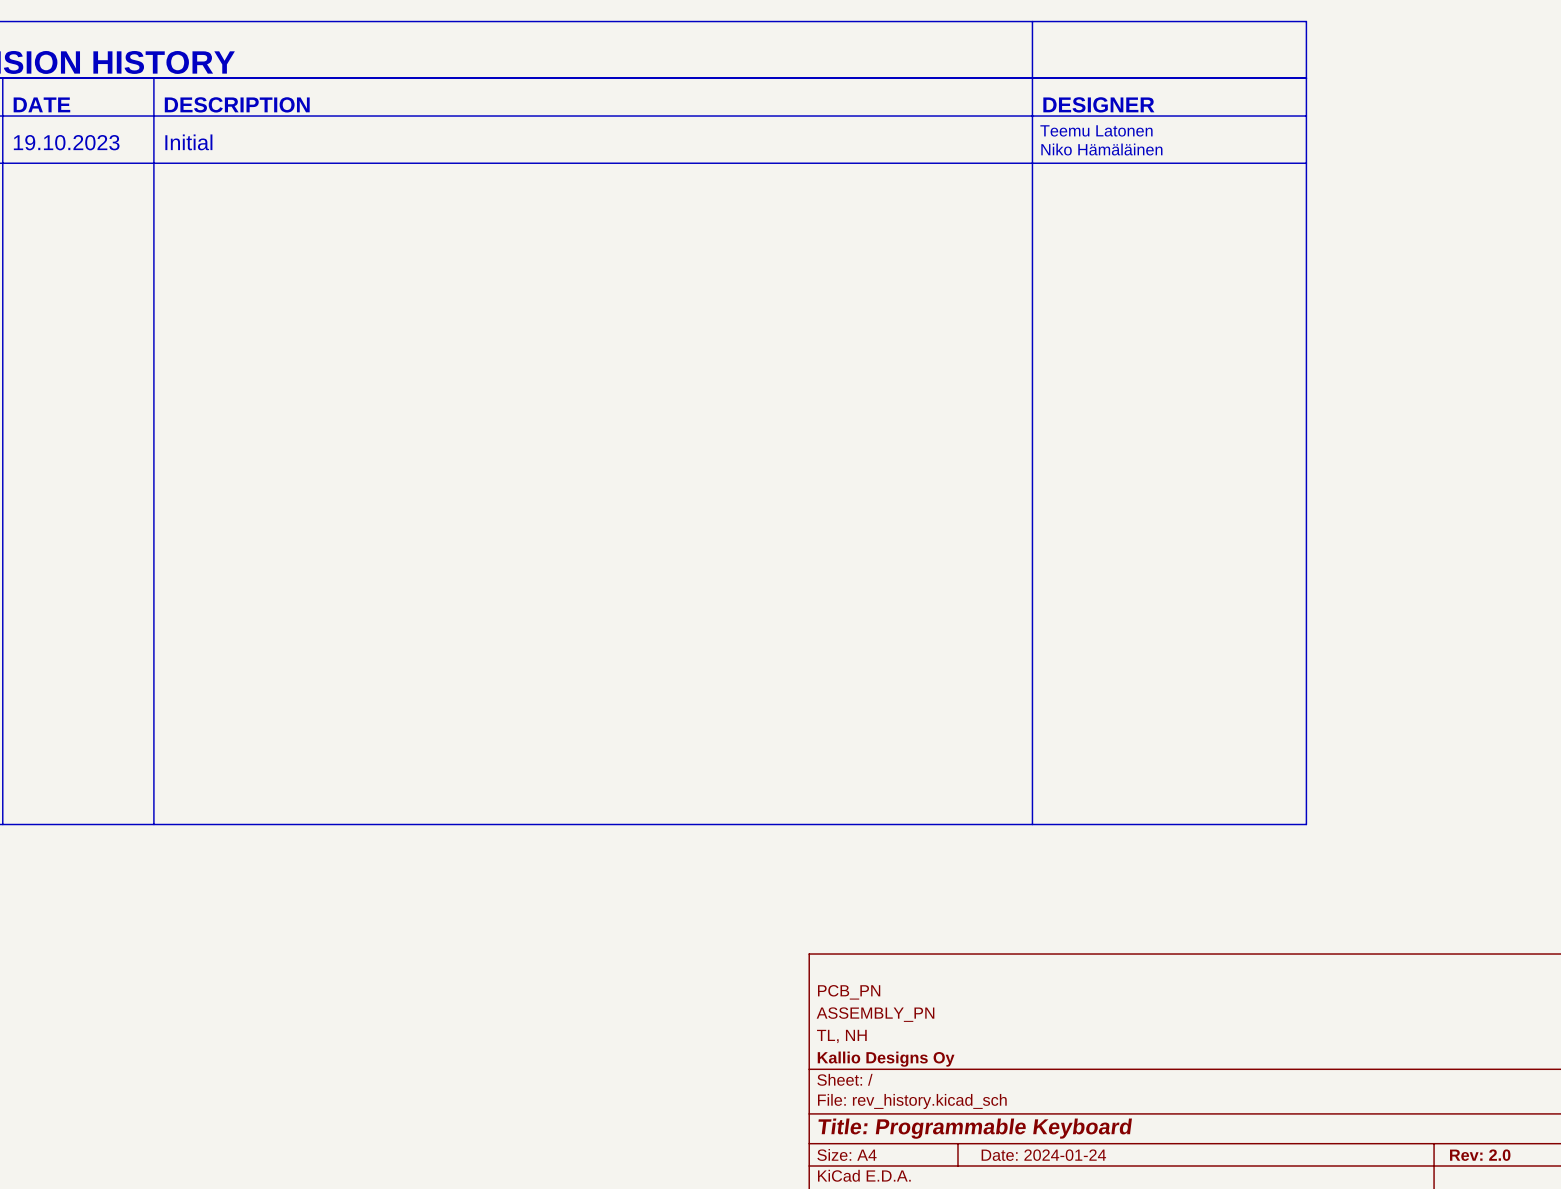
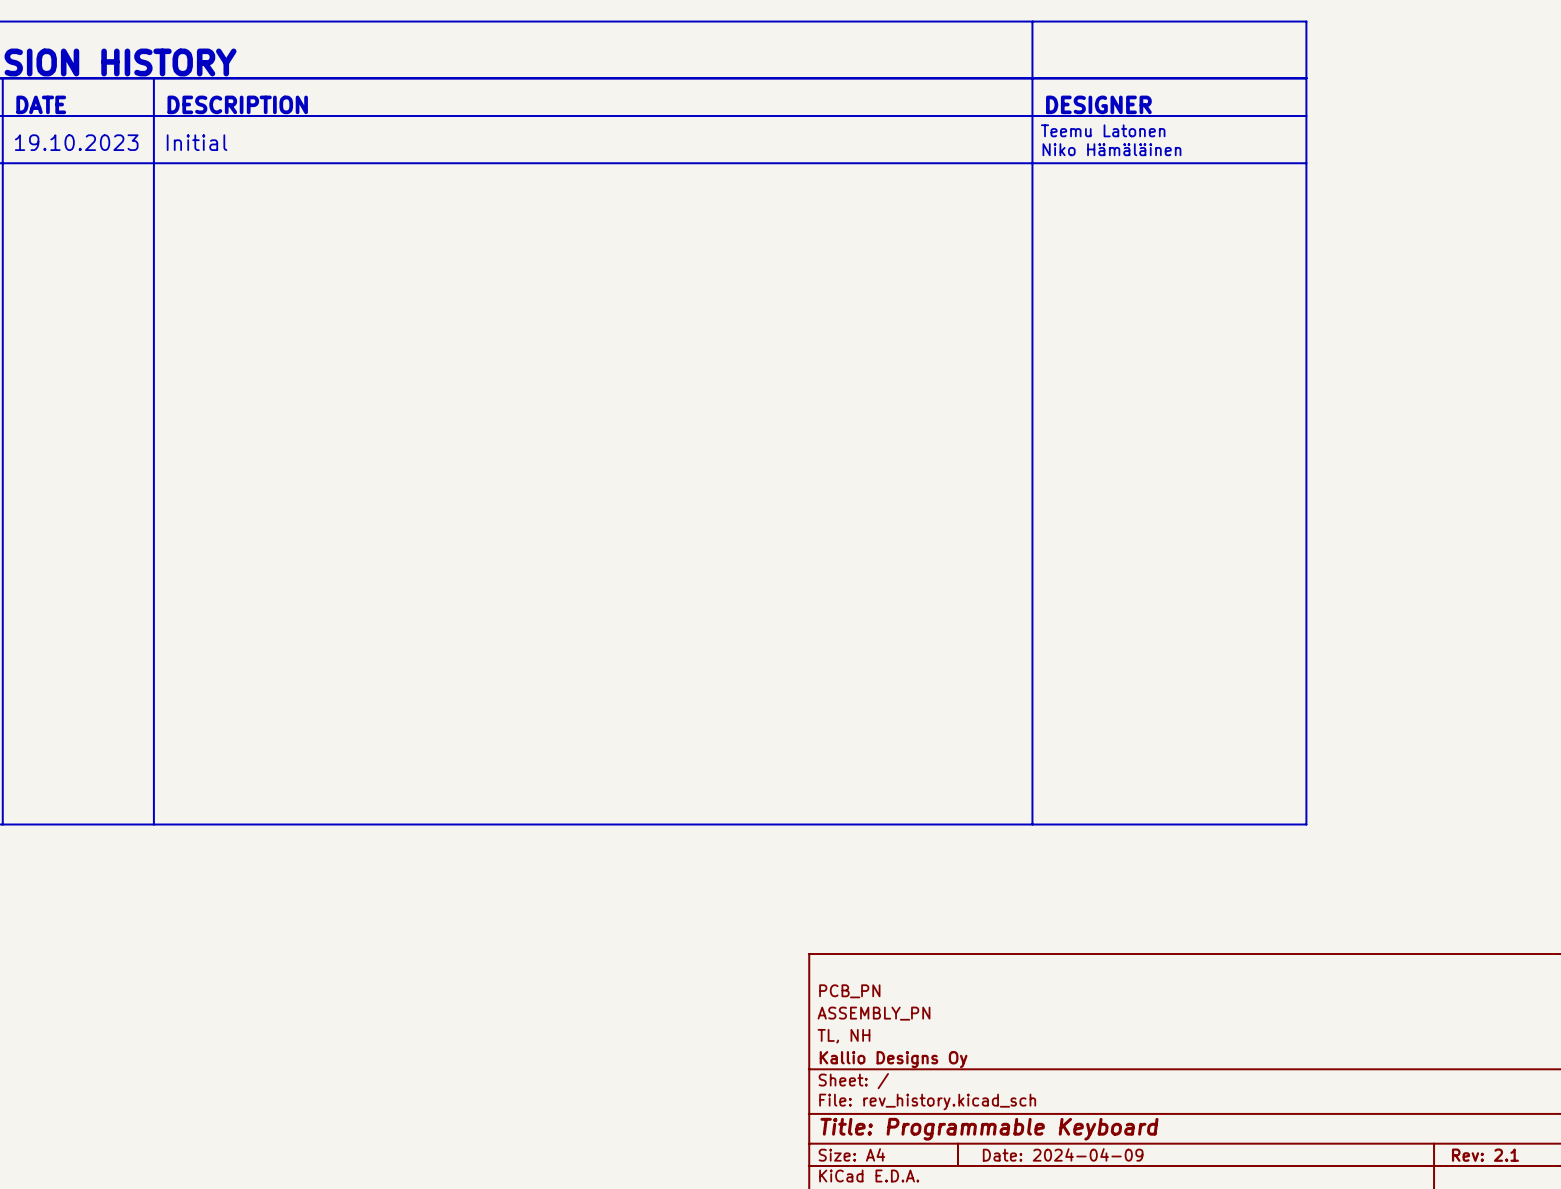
title block: Date: 2024-01-24 (1043, 1155) -> Date: 2024-04-09 (1063, 1154)
title block: Rev: 2.0 (1480, 1155) -> Rev: 2.1 (1485, 1155)

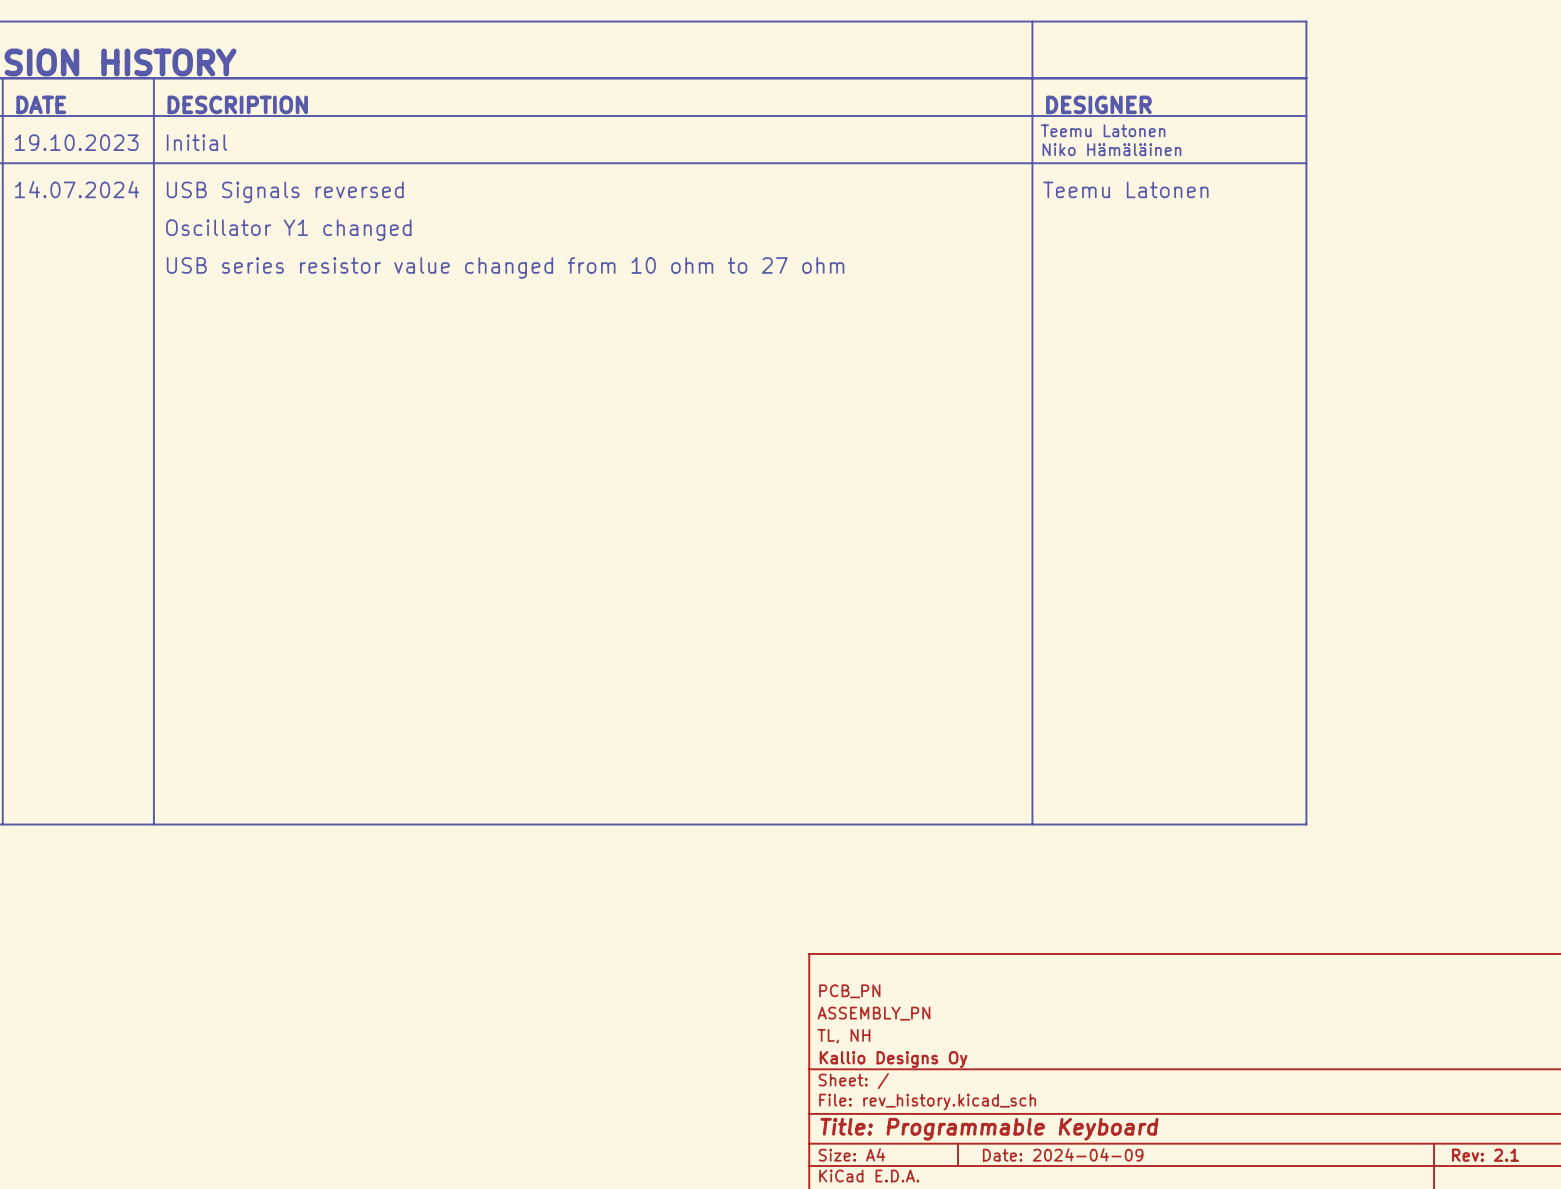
text: none -> 14.07.2024 (77, 189)
text: none -> Teemu Latonen (1125, 189)
text: none -> USB Signals reversed (285, 192)
text: none -> Oscillator Y1 changed (288, 230)
text: none -> USB series resistor value changed from 10 ohm to 27 ohm (505, 267)

